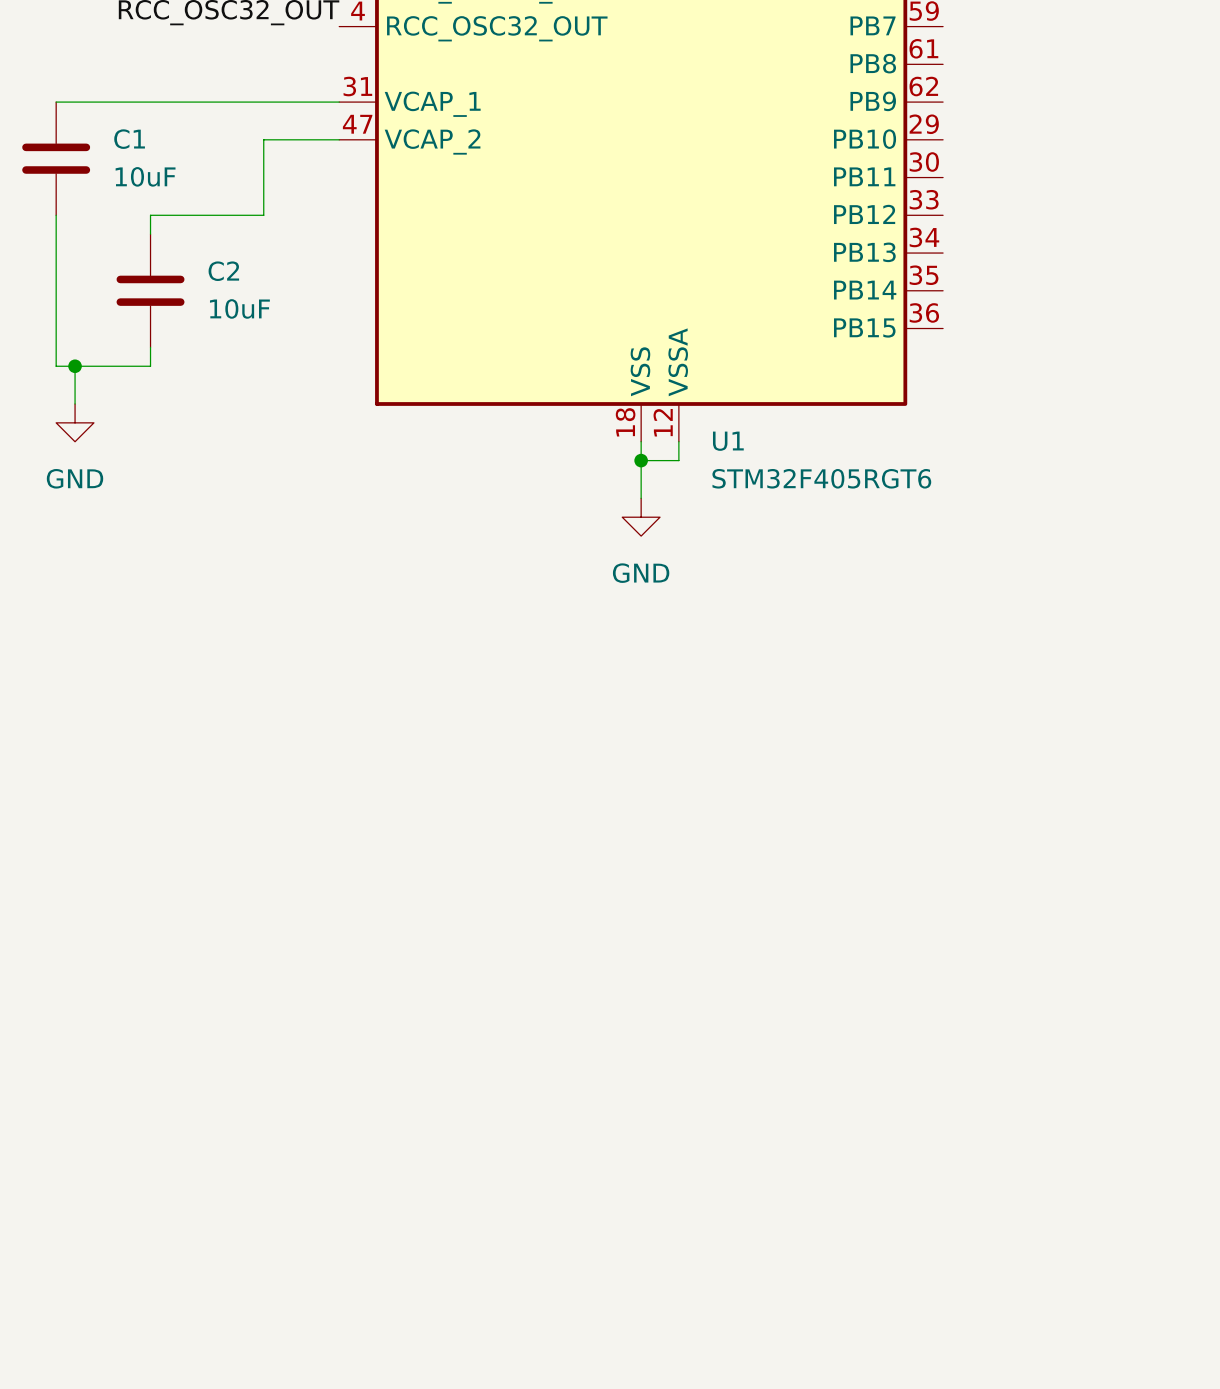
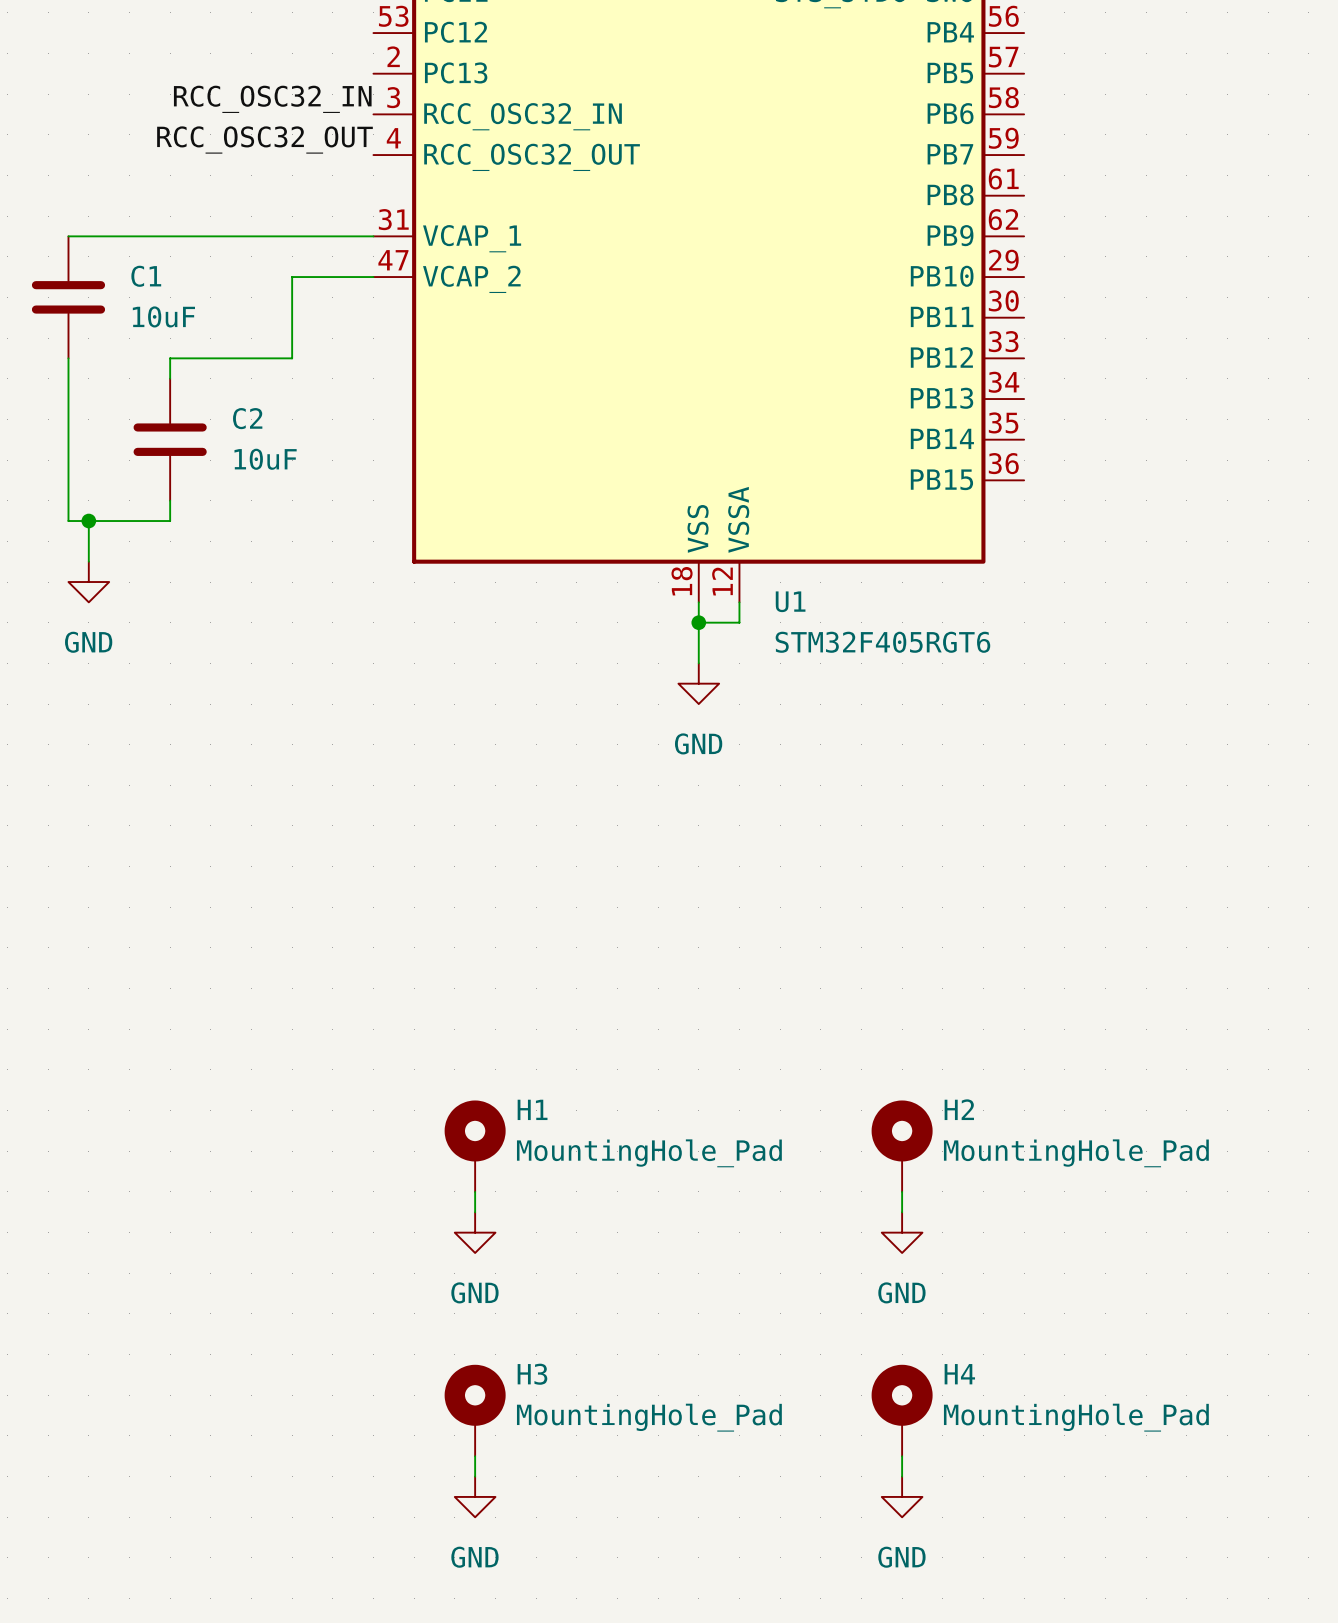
H1: none -> MountingHole_Pad (475, 1146)
H2: none -> MountingHole_Pad (902, 1146)
wire: none -> (475, 1191) (475, 1212)
wire: none -> (902, 1191) (902, 1212)
power symbol: none -> GND (475, 1232)
power symbol: none -> GND (902, 1232)
H3: none -> MountingHole_Pad (475, 1410)
H4: none -> MountingHole_Pad (902, 1410)
wire: none -> (475, 1456) (475, 1476)
wire: none -> (902, 1456) (902, 1476)
power symbol: none -> GND (475, 1496)
power symbol: none -> GND (902, 1496)

